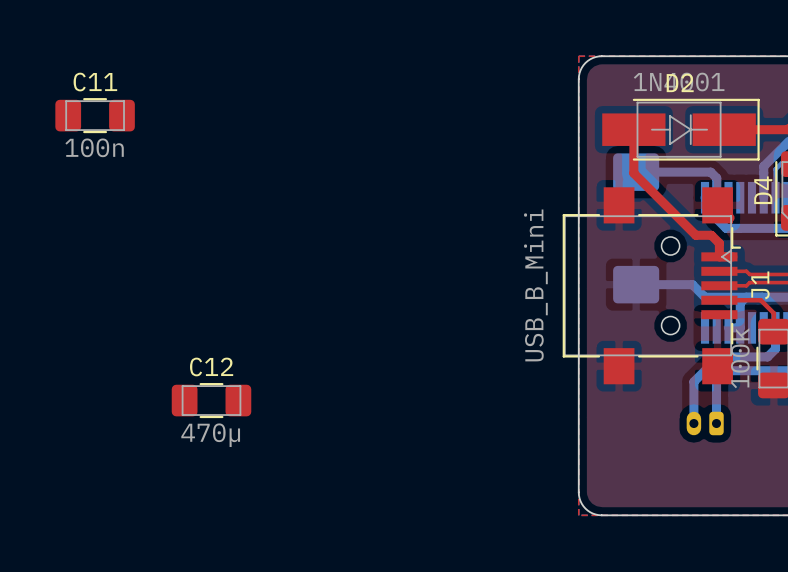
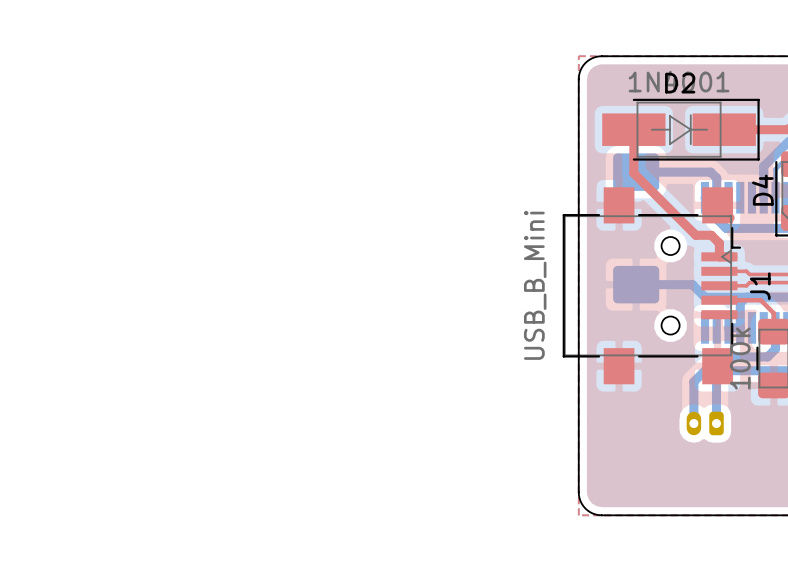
C11: 100n (95, 115) -> none
C12: 470µ (211, 400) -> none

